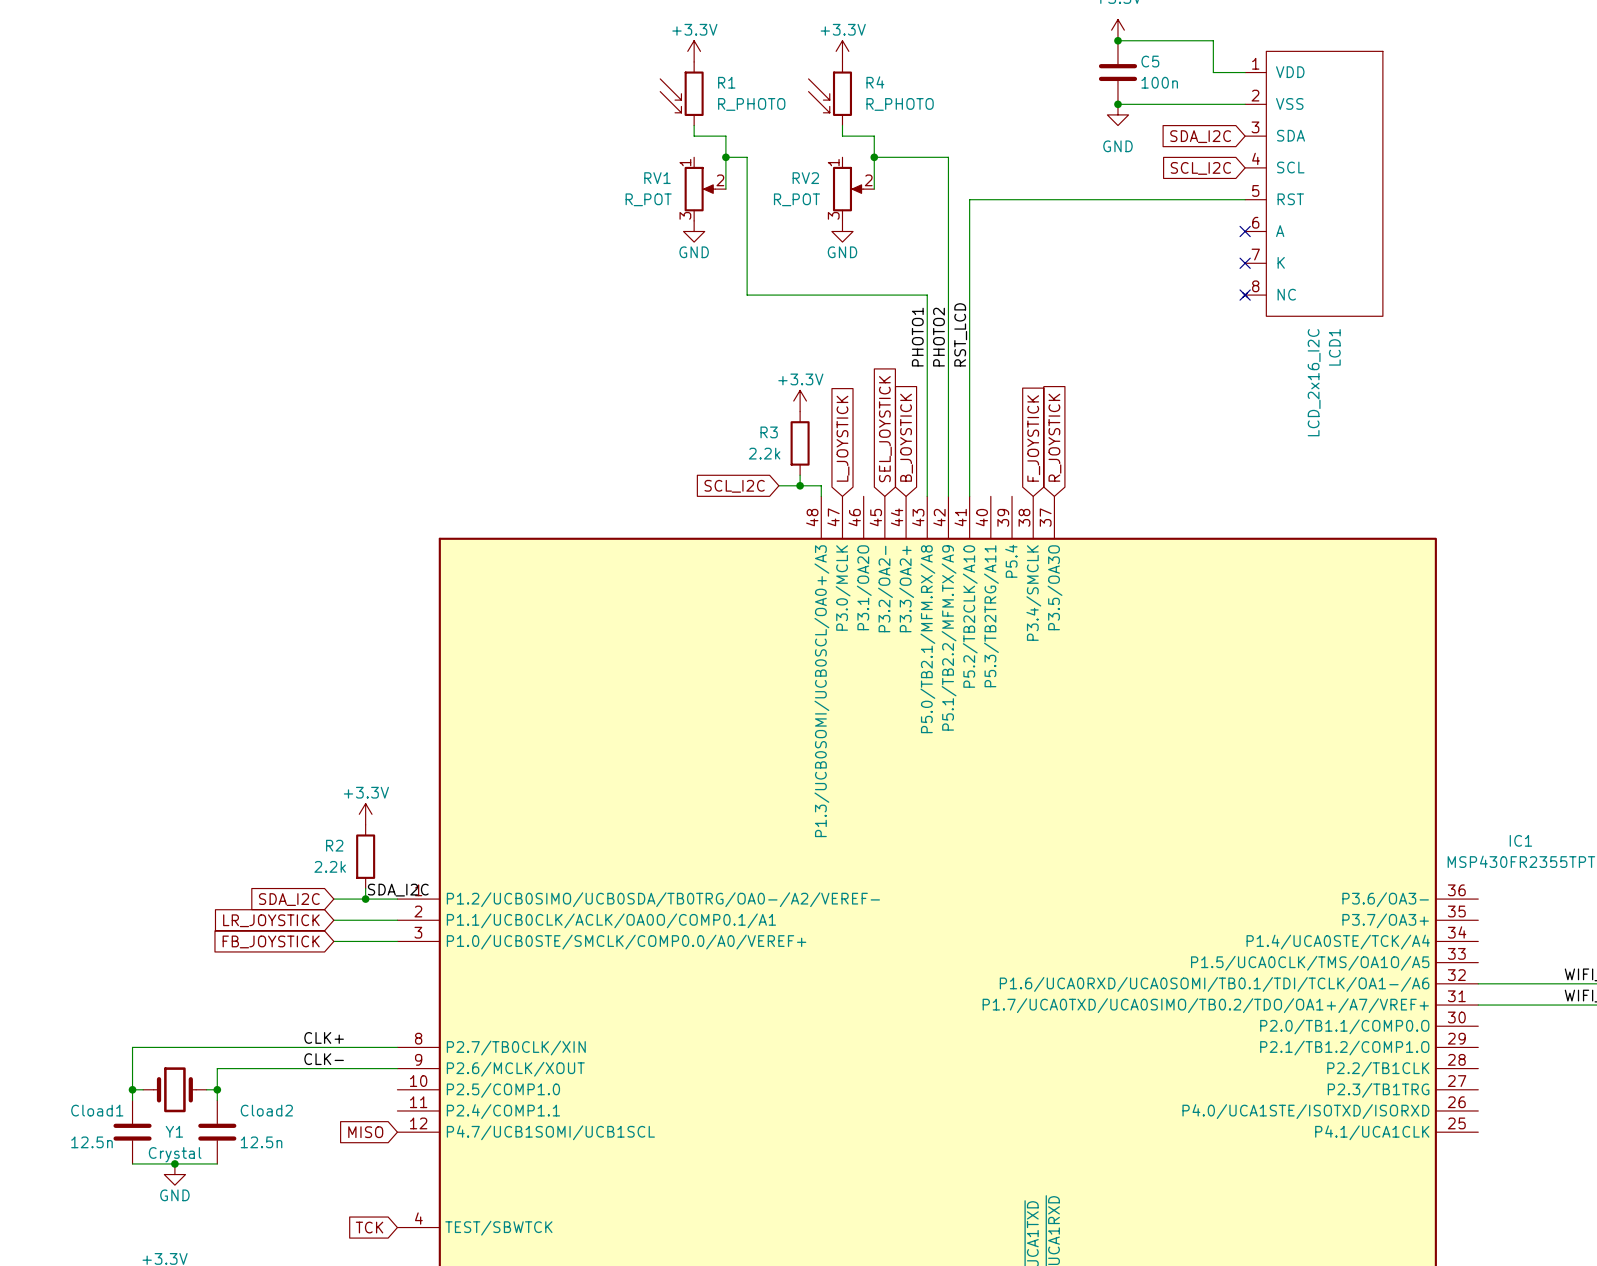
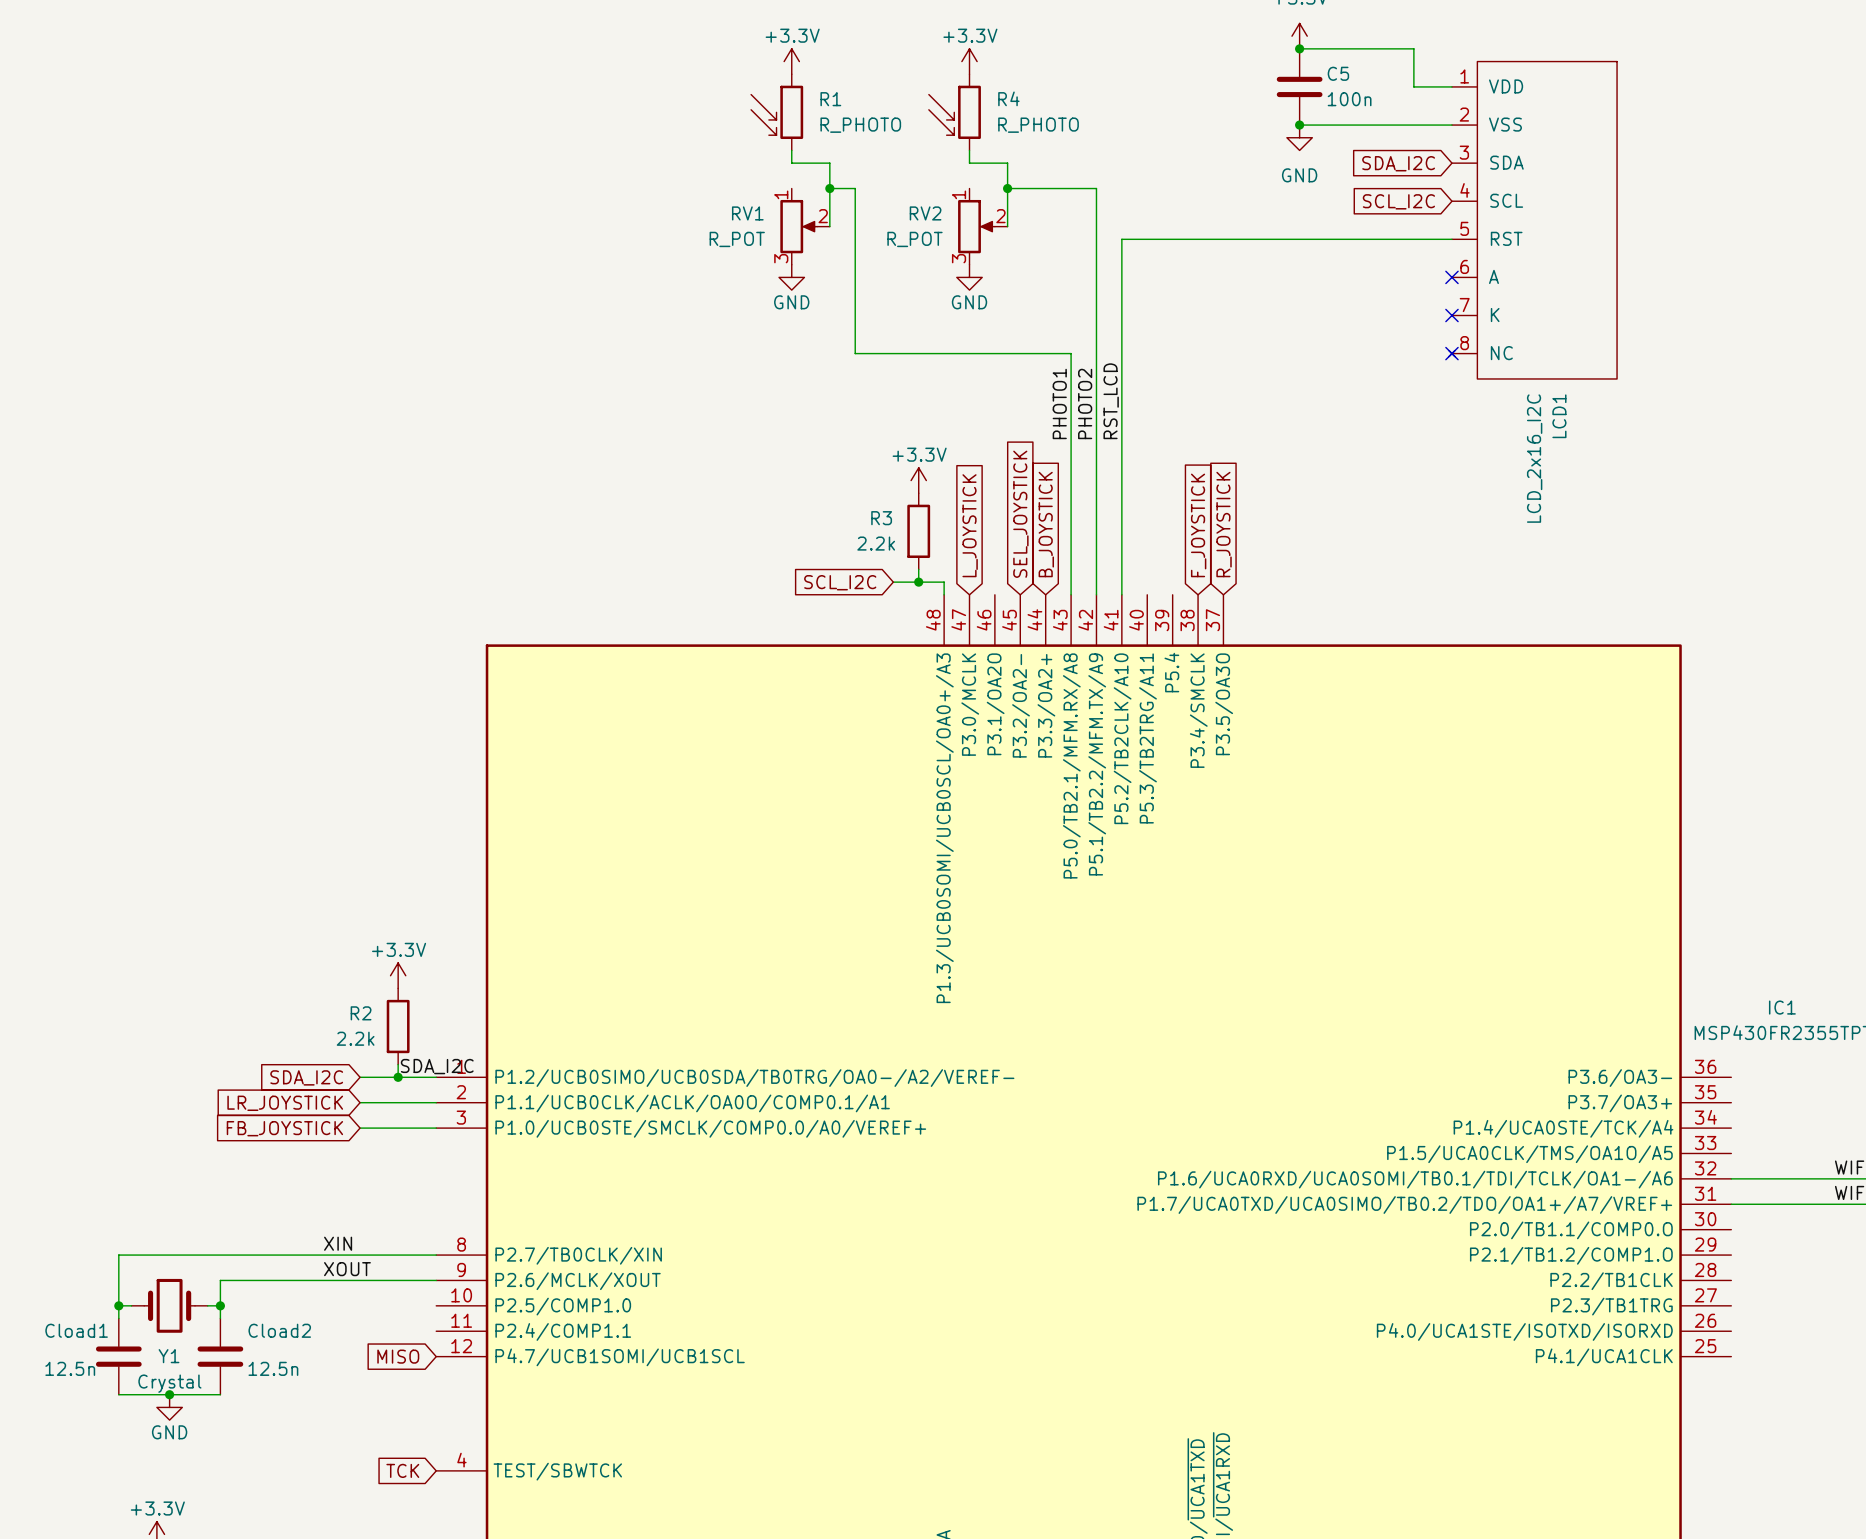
label: CLK+ (324, 1037) -> XIN (338, 1243)
label: CLK- (324, 1059) -> XOUT (347, 1269)

